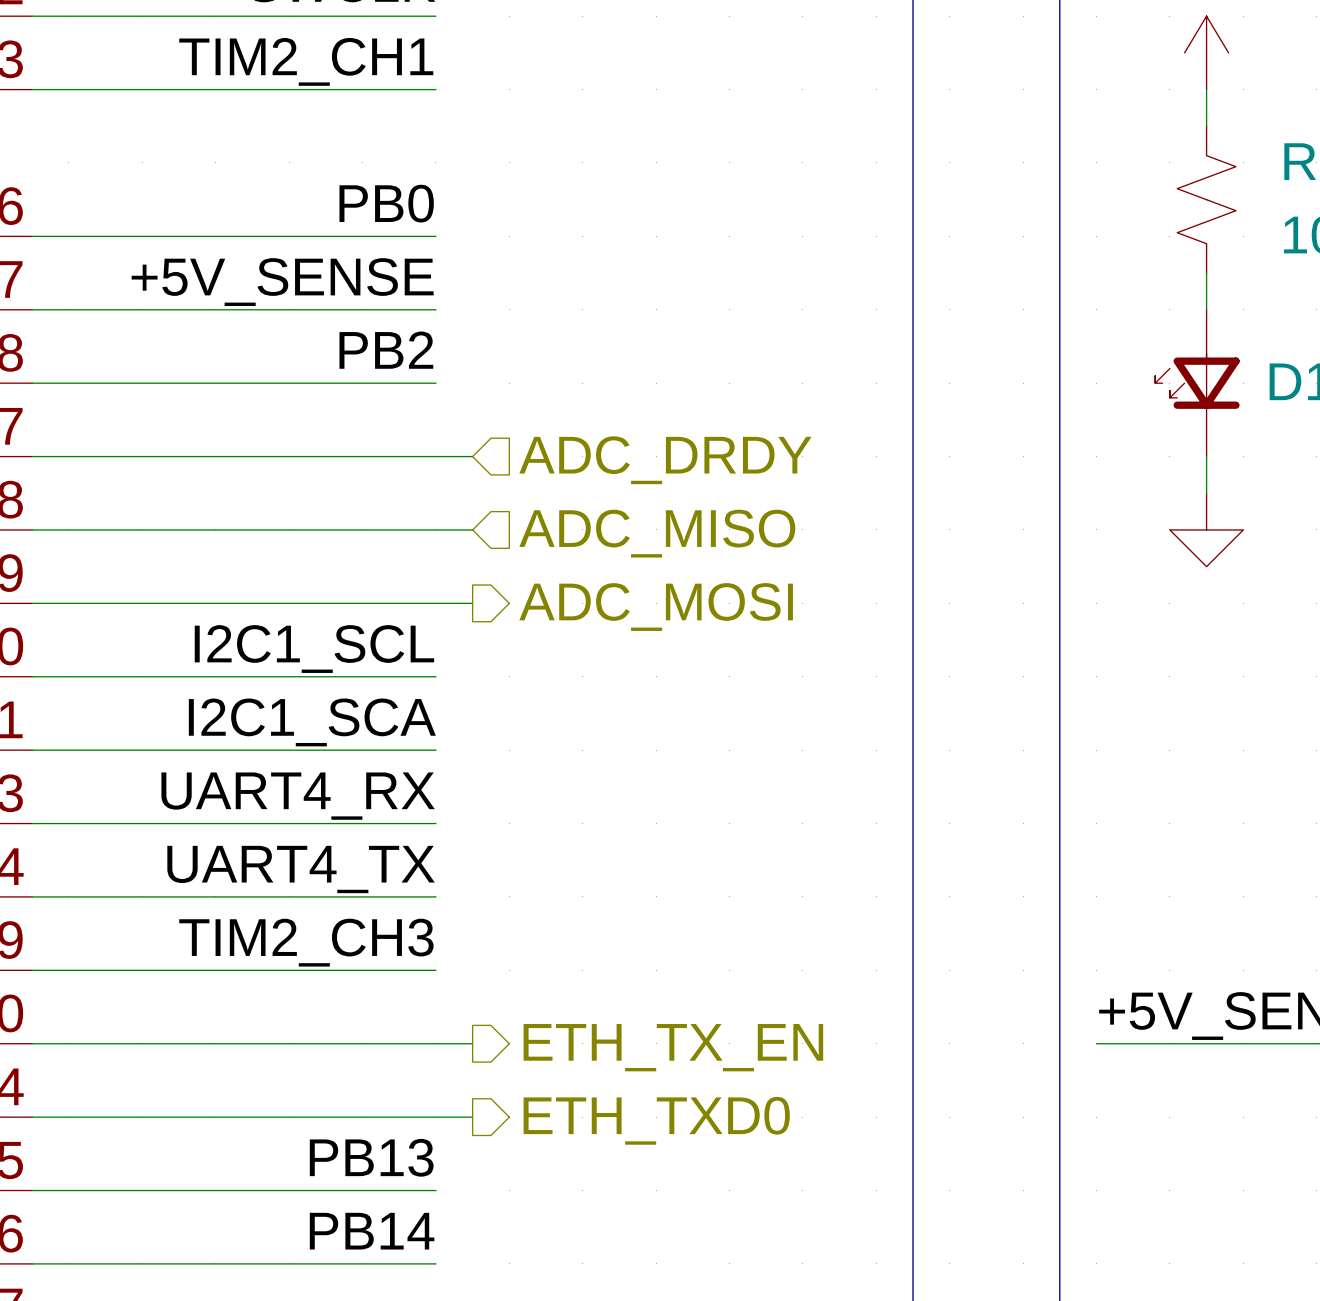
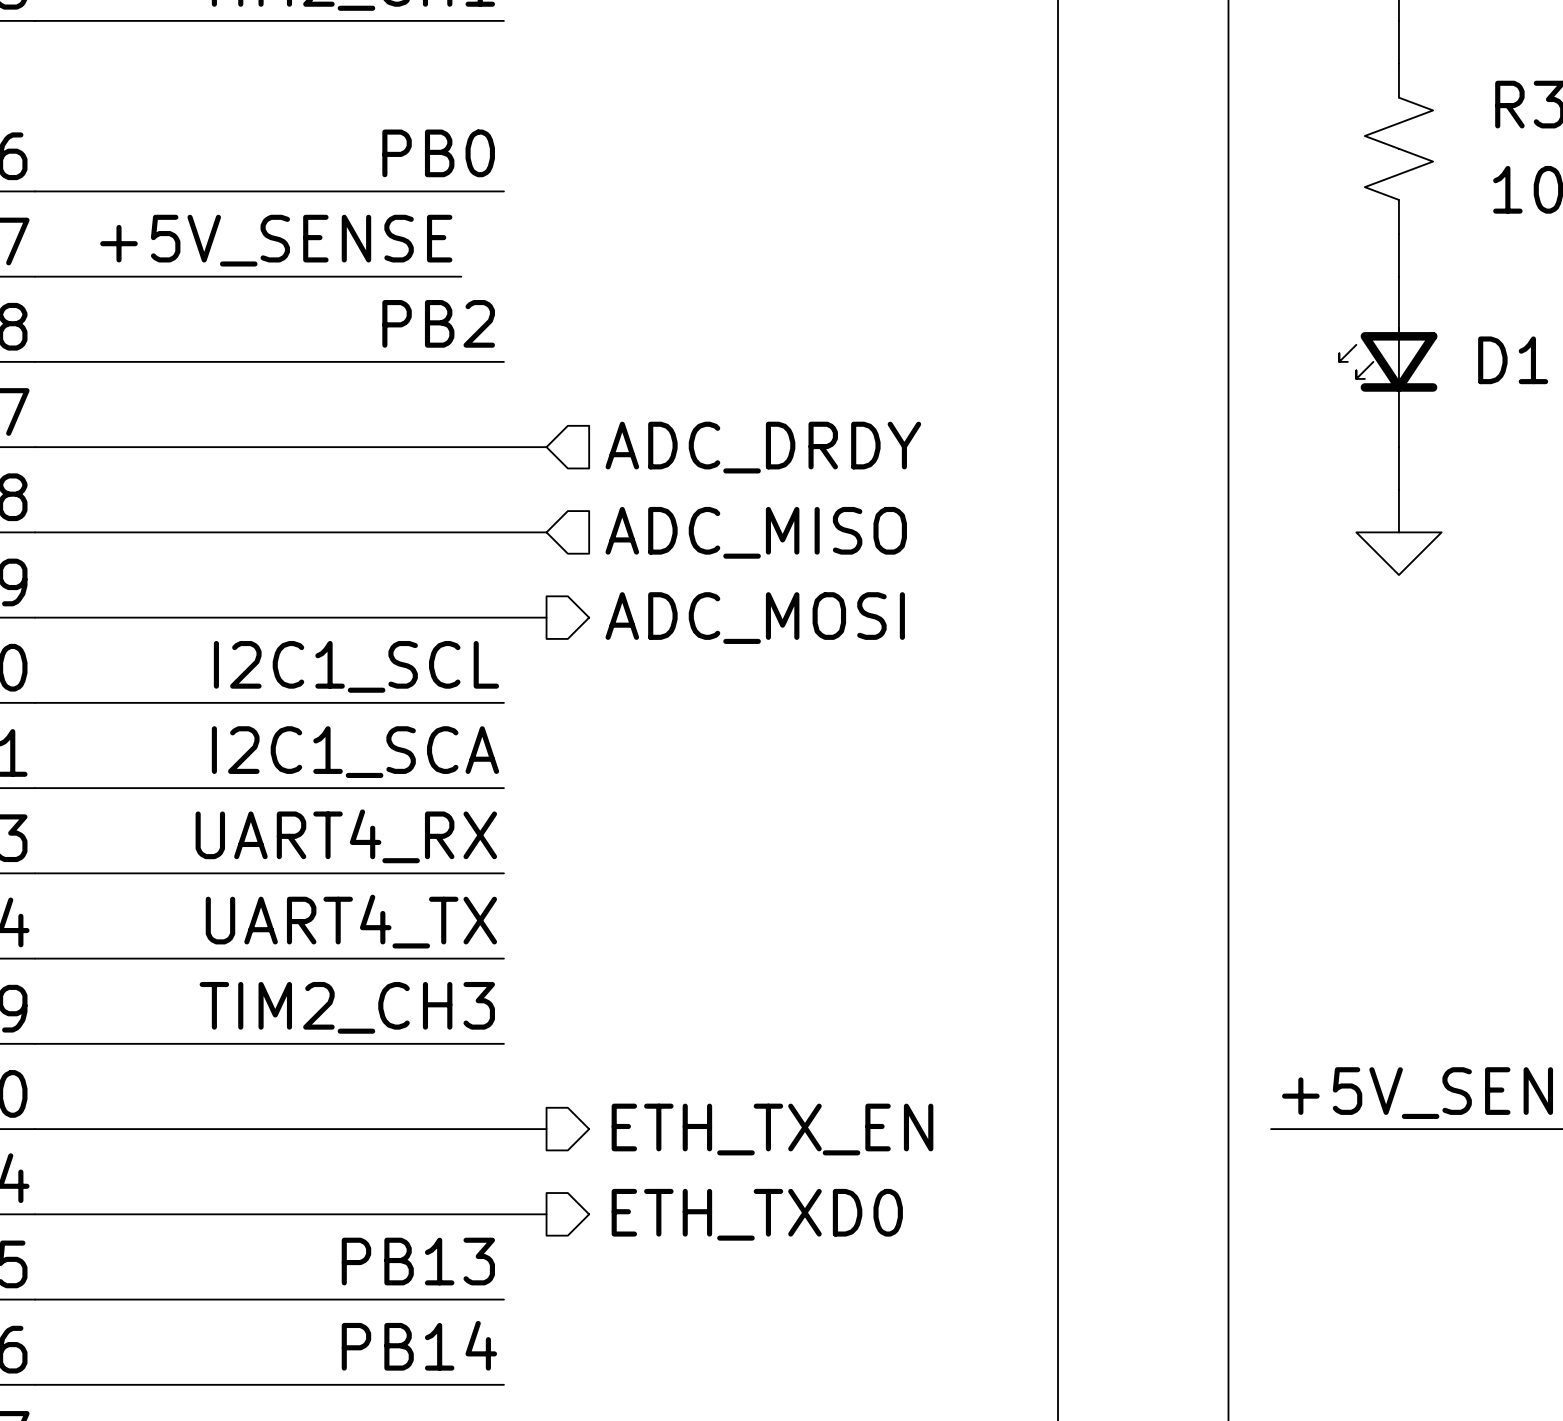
label position: +5V_SENSE (282, 282) -> +5V_SENSE (276, 240)
wire: (399, 309) (435, 309) -> none

